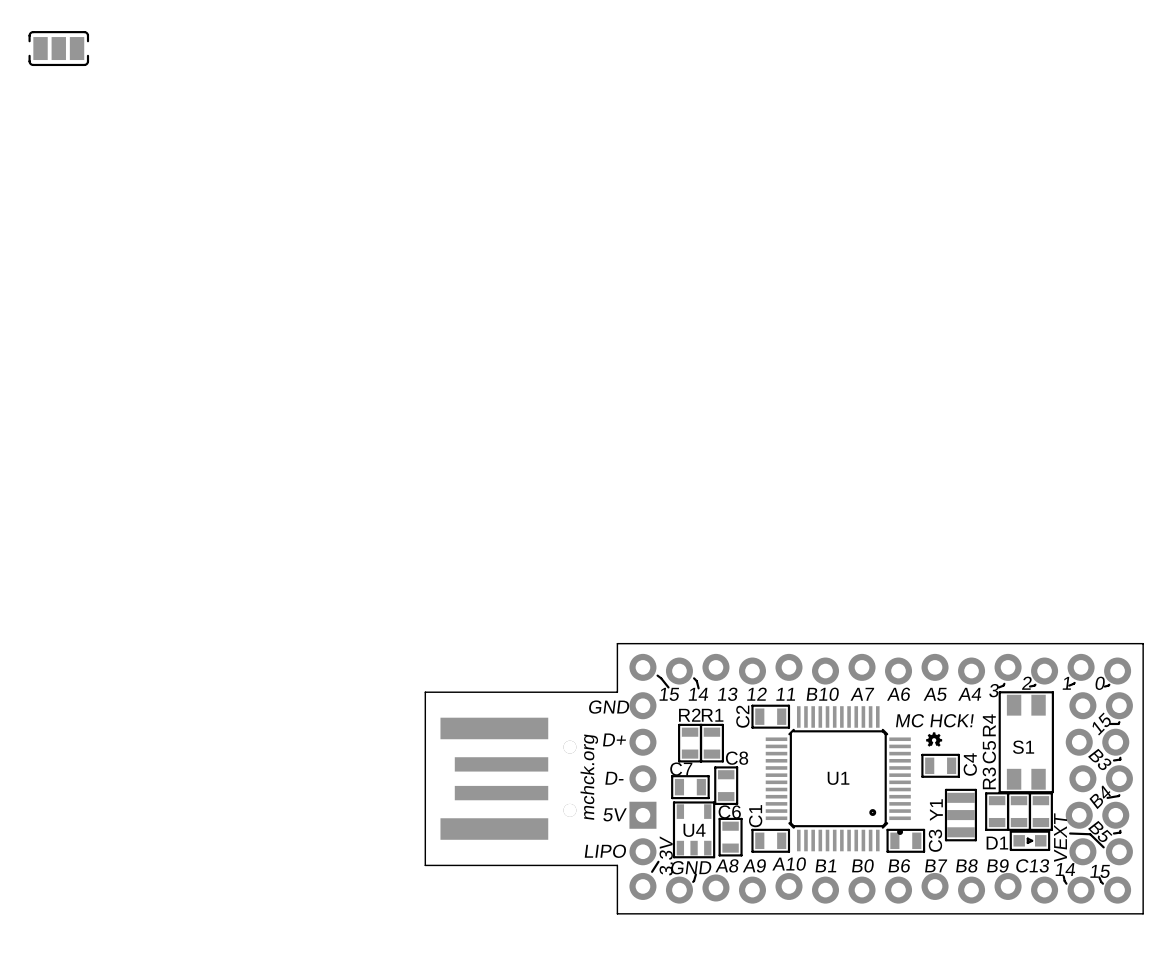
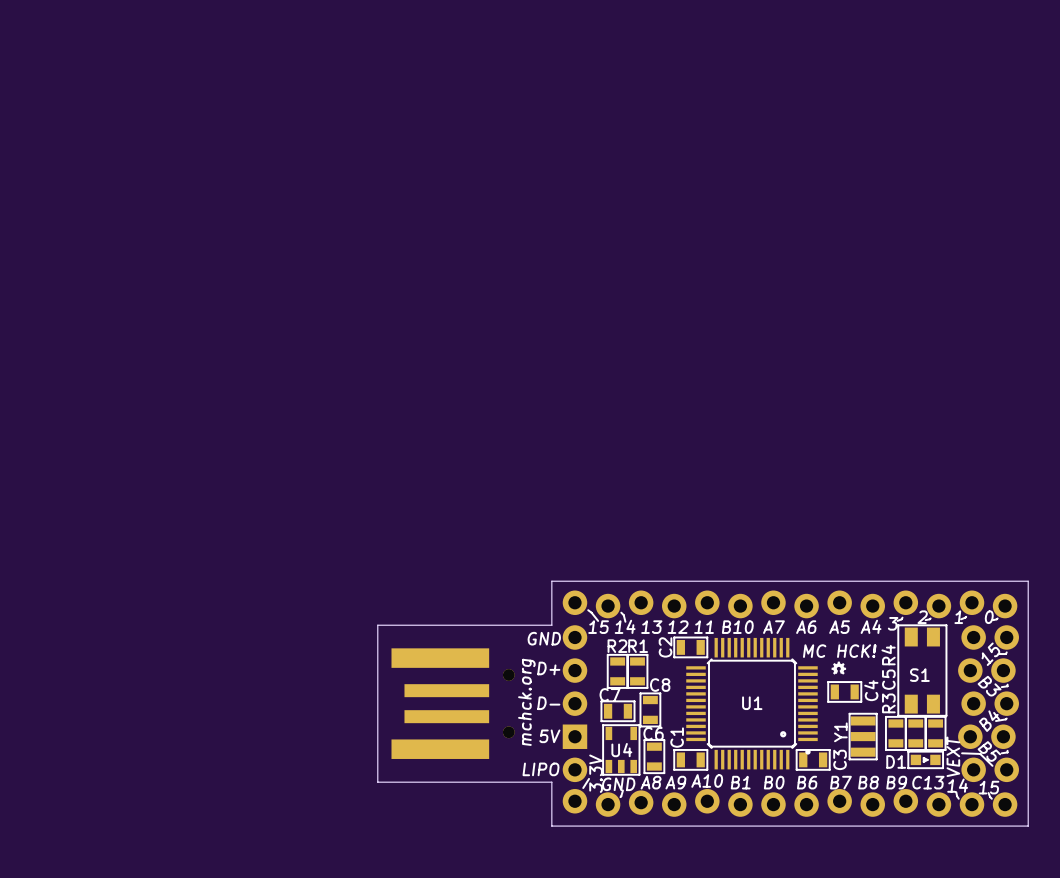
part: (58, 48) -> none

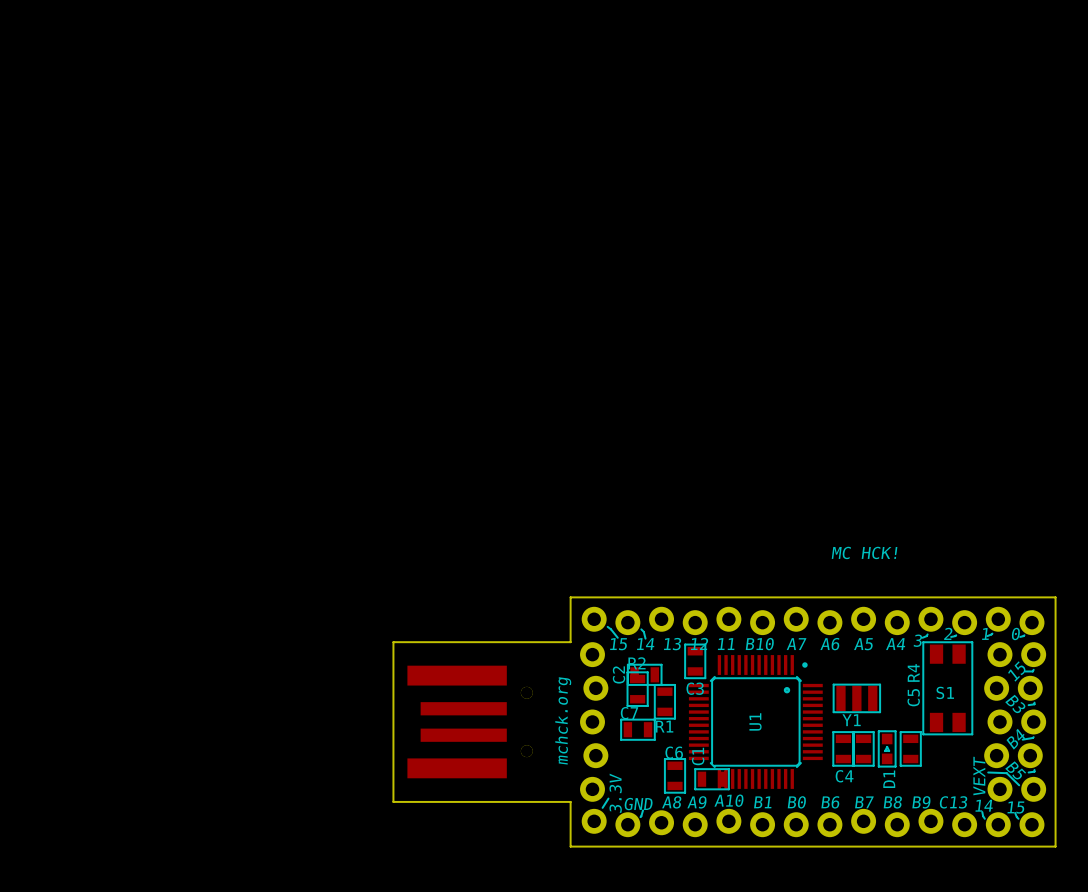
R1 name position: R1 (638, 646) -> R1 (664, 726)
C2 position: (690, 647) -> (644, 674)
text position: MC HCK! (839, 651) -> MC HCK! (864, 552)
drawing: [831, 661, 847, 675] -> none
R1 position: (637, 671) -> (664, 701)
part: (574, 687) -> none
C4 rotation: 0° (844, 691) -> 90° clockwise (843, 748)
C4 position: (844, 691) -> (843, 748)
text position: mchck.org (526, 702) -> mchck.org (563, 720)
part: none -> (594, 721)
U1 rotation: 0° (751, 703) -> 90° counterclockwise (755, 721)
C8: (650, 709) -> none
Y1 name position: Y1 (840, 732) -> Y1 (851, 720)
R3: (895, 733) -> none
C5 position: (915, 733) -> (910, 748)
R4 position: (935, 733) -> (863, 748)
Y1 rotation: 0° (863, 736) -> 90° clockwise (856, 698)
Y1 position: (863, 736) -> (856, 698)
U4: (621, 749) -> none
C3 rotation: 0° (813, 759) -> 90° clockwise (695, 661)
C3 position: (813, 759) -> (695, 661)
D1 rotation: 0° (925, 759) -> 90° counterclockwise (887, 748)
D1 position: (925, 759) -> (887, 748)
part: (574, 769) -> none

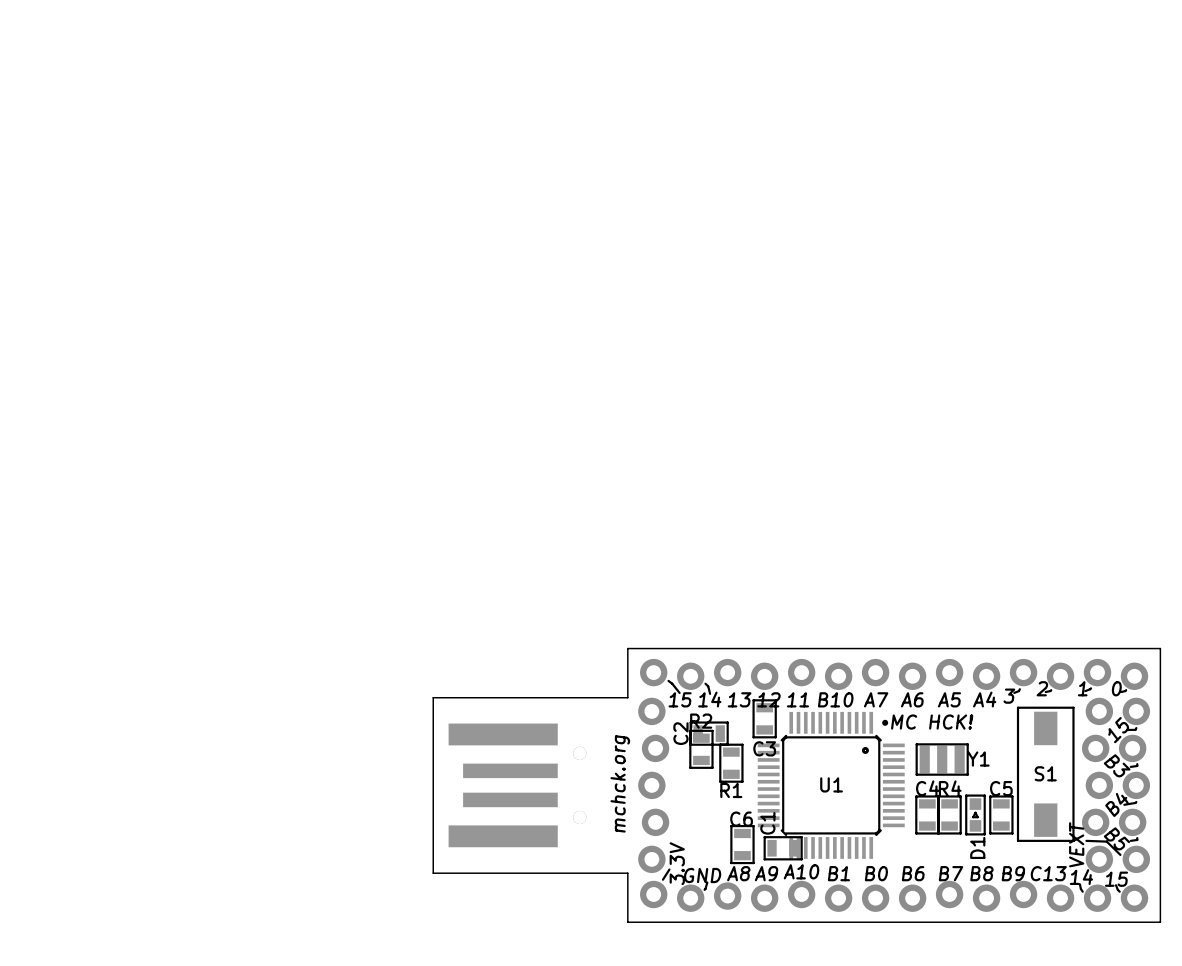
text position: MC HCK! (864, 552) -> MC HCK! (932, 722)
S1 footprint: [922, 641, 974, 736] -> [1016, 706, 1075, 842]
R4 name rotation: 0° (913, 672) -> 90° clockwise (950, 788)
R4 name position: R4 (913, 672) -> R4 (950, 788)
C5 name rotation: 0° (913, 697) -> 90° clockwise (1001, 788)
Y1 name position: Y1 (851, 720) -> Y1 (978, 759)
U1 name rotation: 0° (755, 721) -> 90° clockwise (831, 784)
C7: (637, 729) -> none
C4 name position: C4 (844, 776) -> C4 (927, 788)

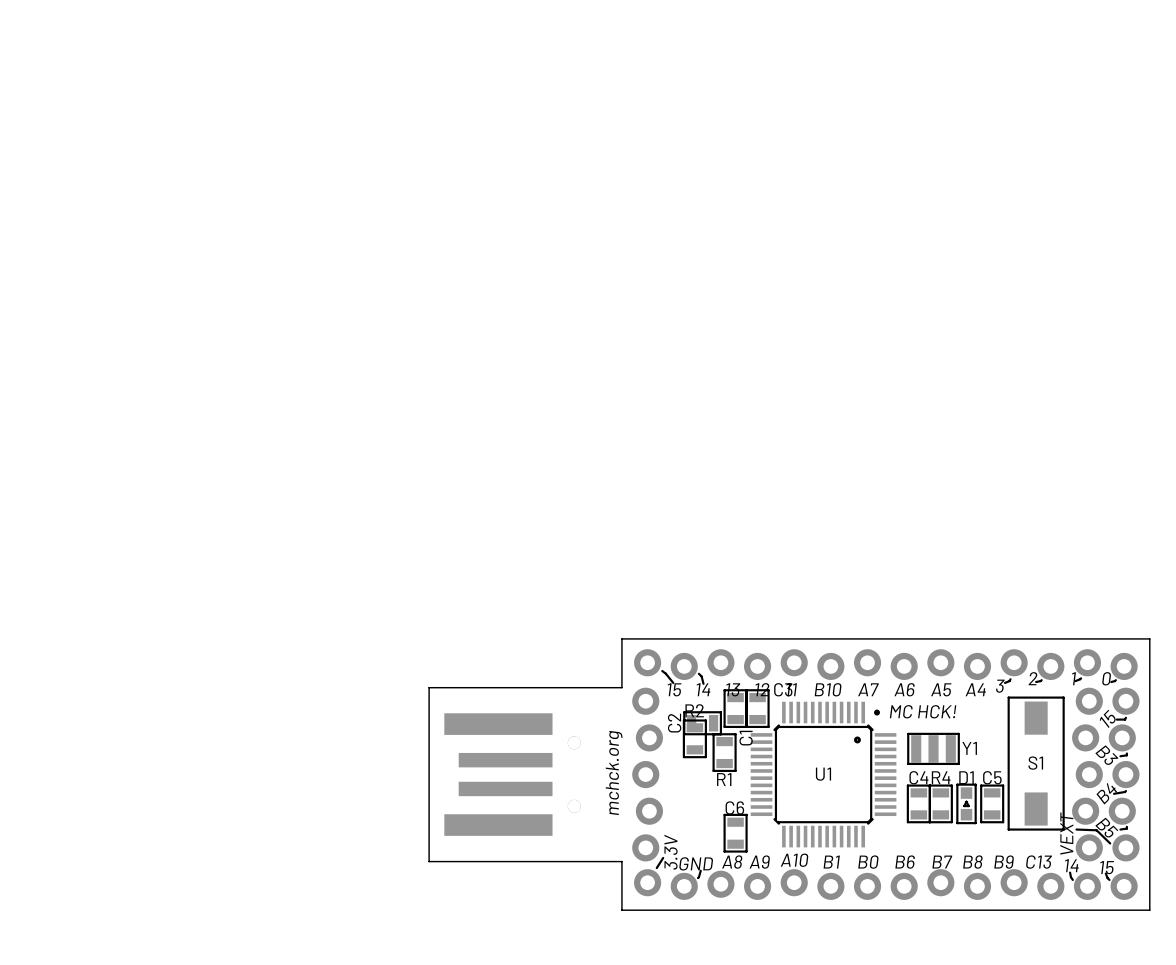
C3 name position: C3 (764, 748) -> C3 (783, 689)
C1 name position: C1 (767, 823) -> C1 (746, 738)
D1 name rotation: 0° (977, 847) -> 90° clockwise (966, 777)
D1 name position: D1 (977, 847) -> D1 (966, 777)
C1 rotation: 0° (783, 848) -> 90° clockwise (735, 708)
C1 position: (783, 848) -> (735, 708)

